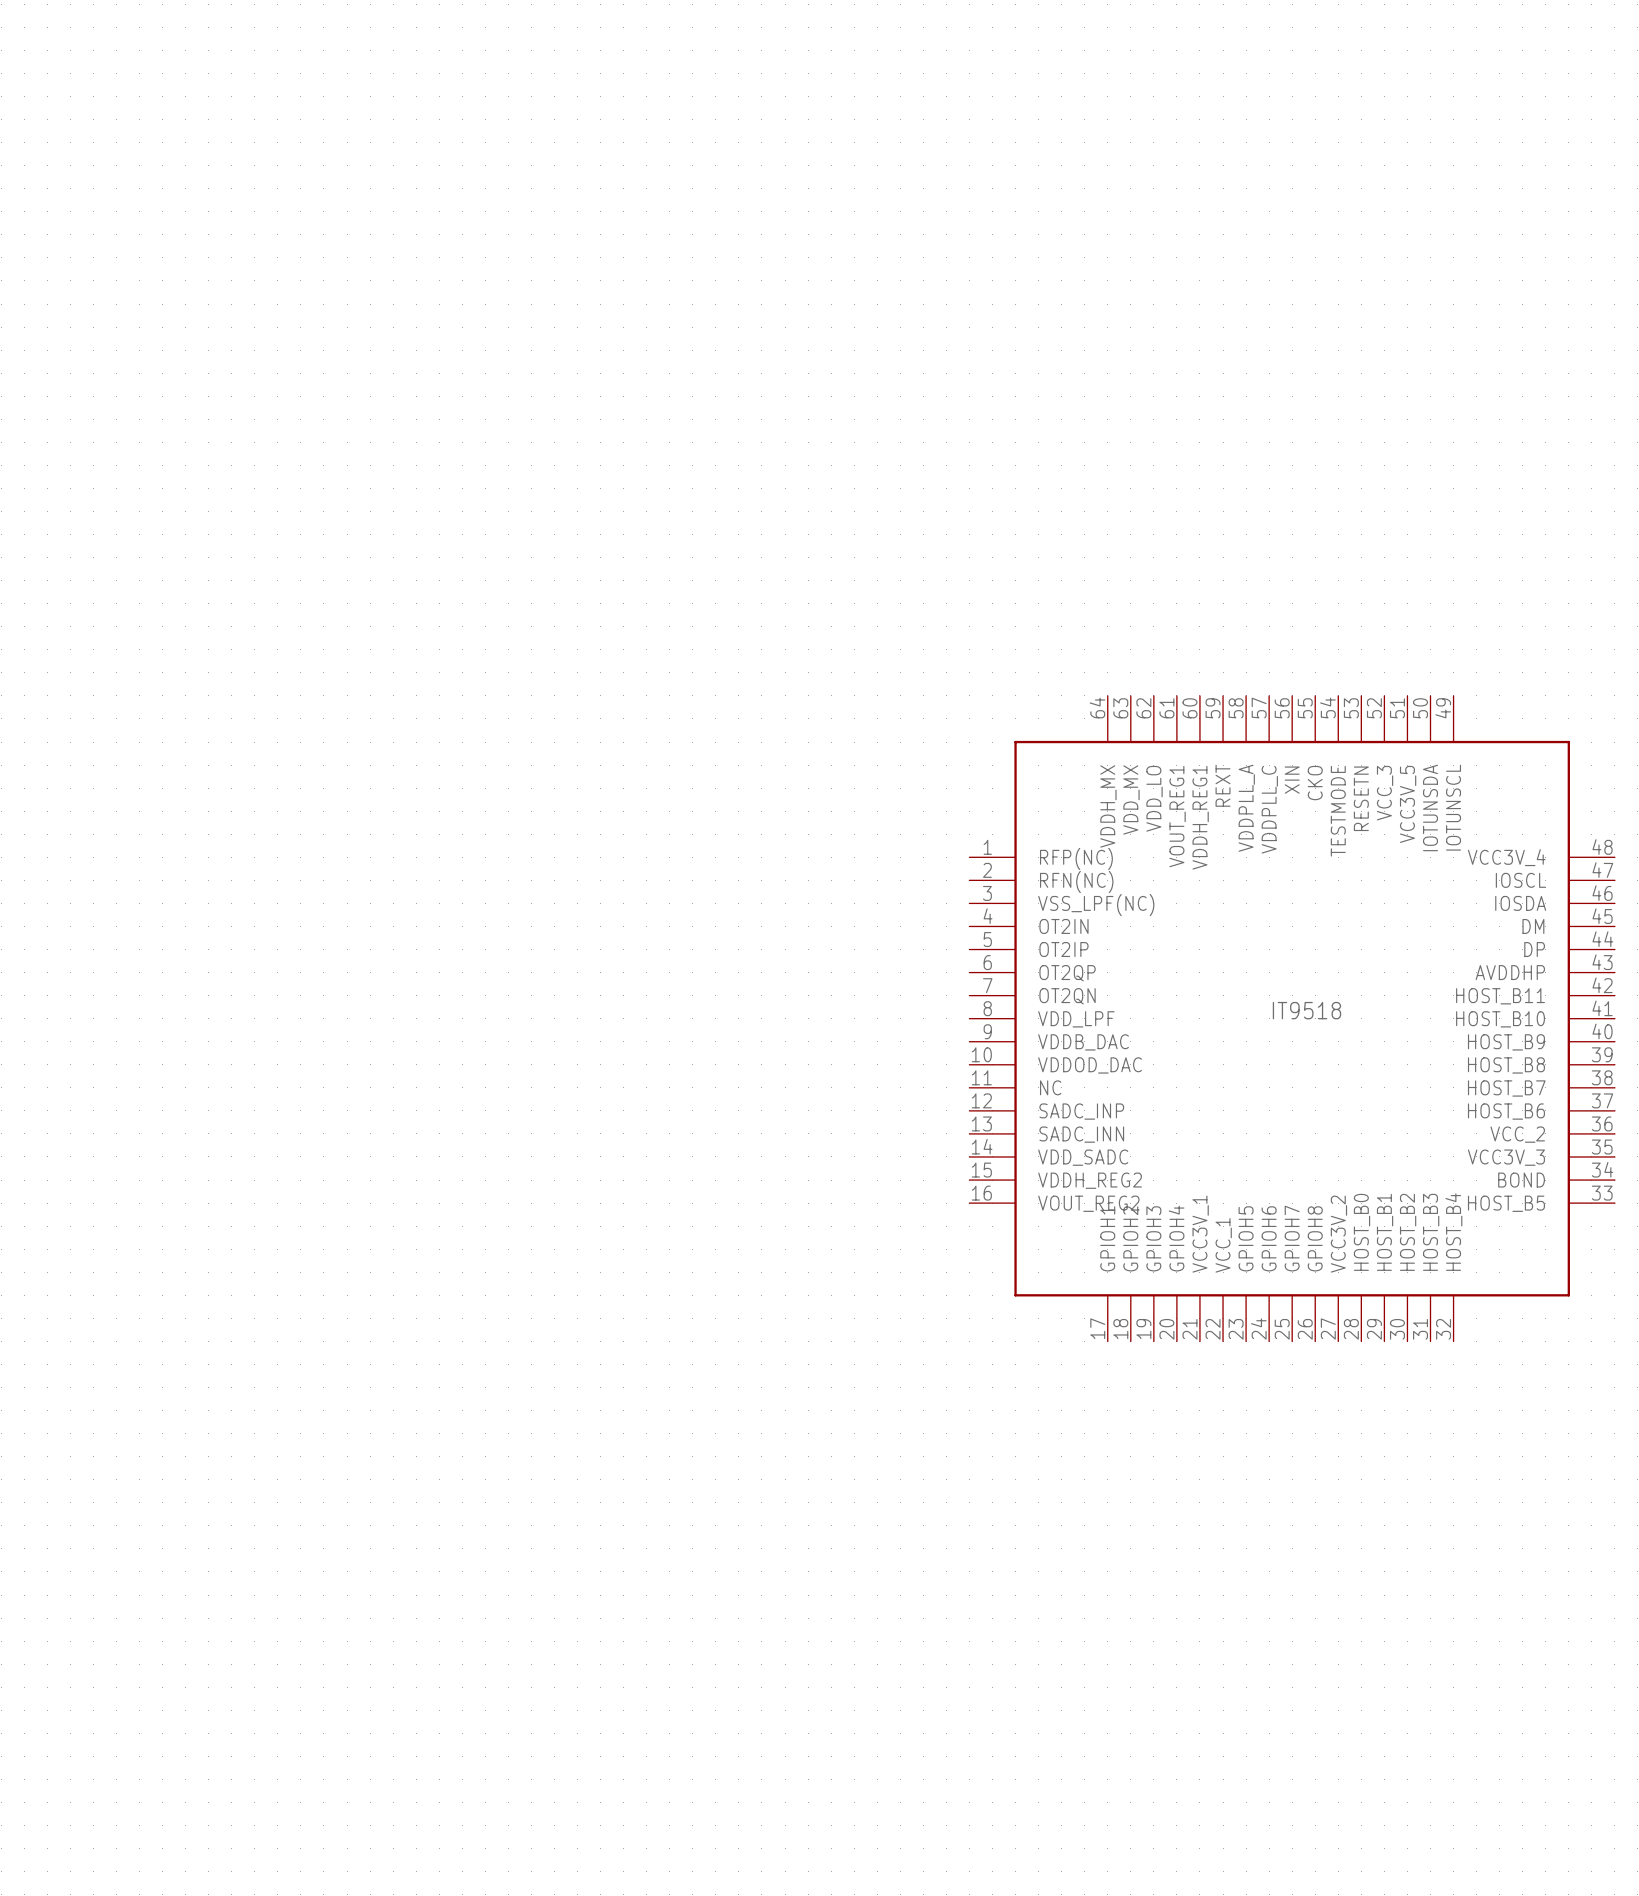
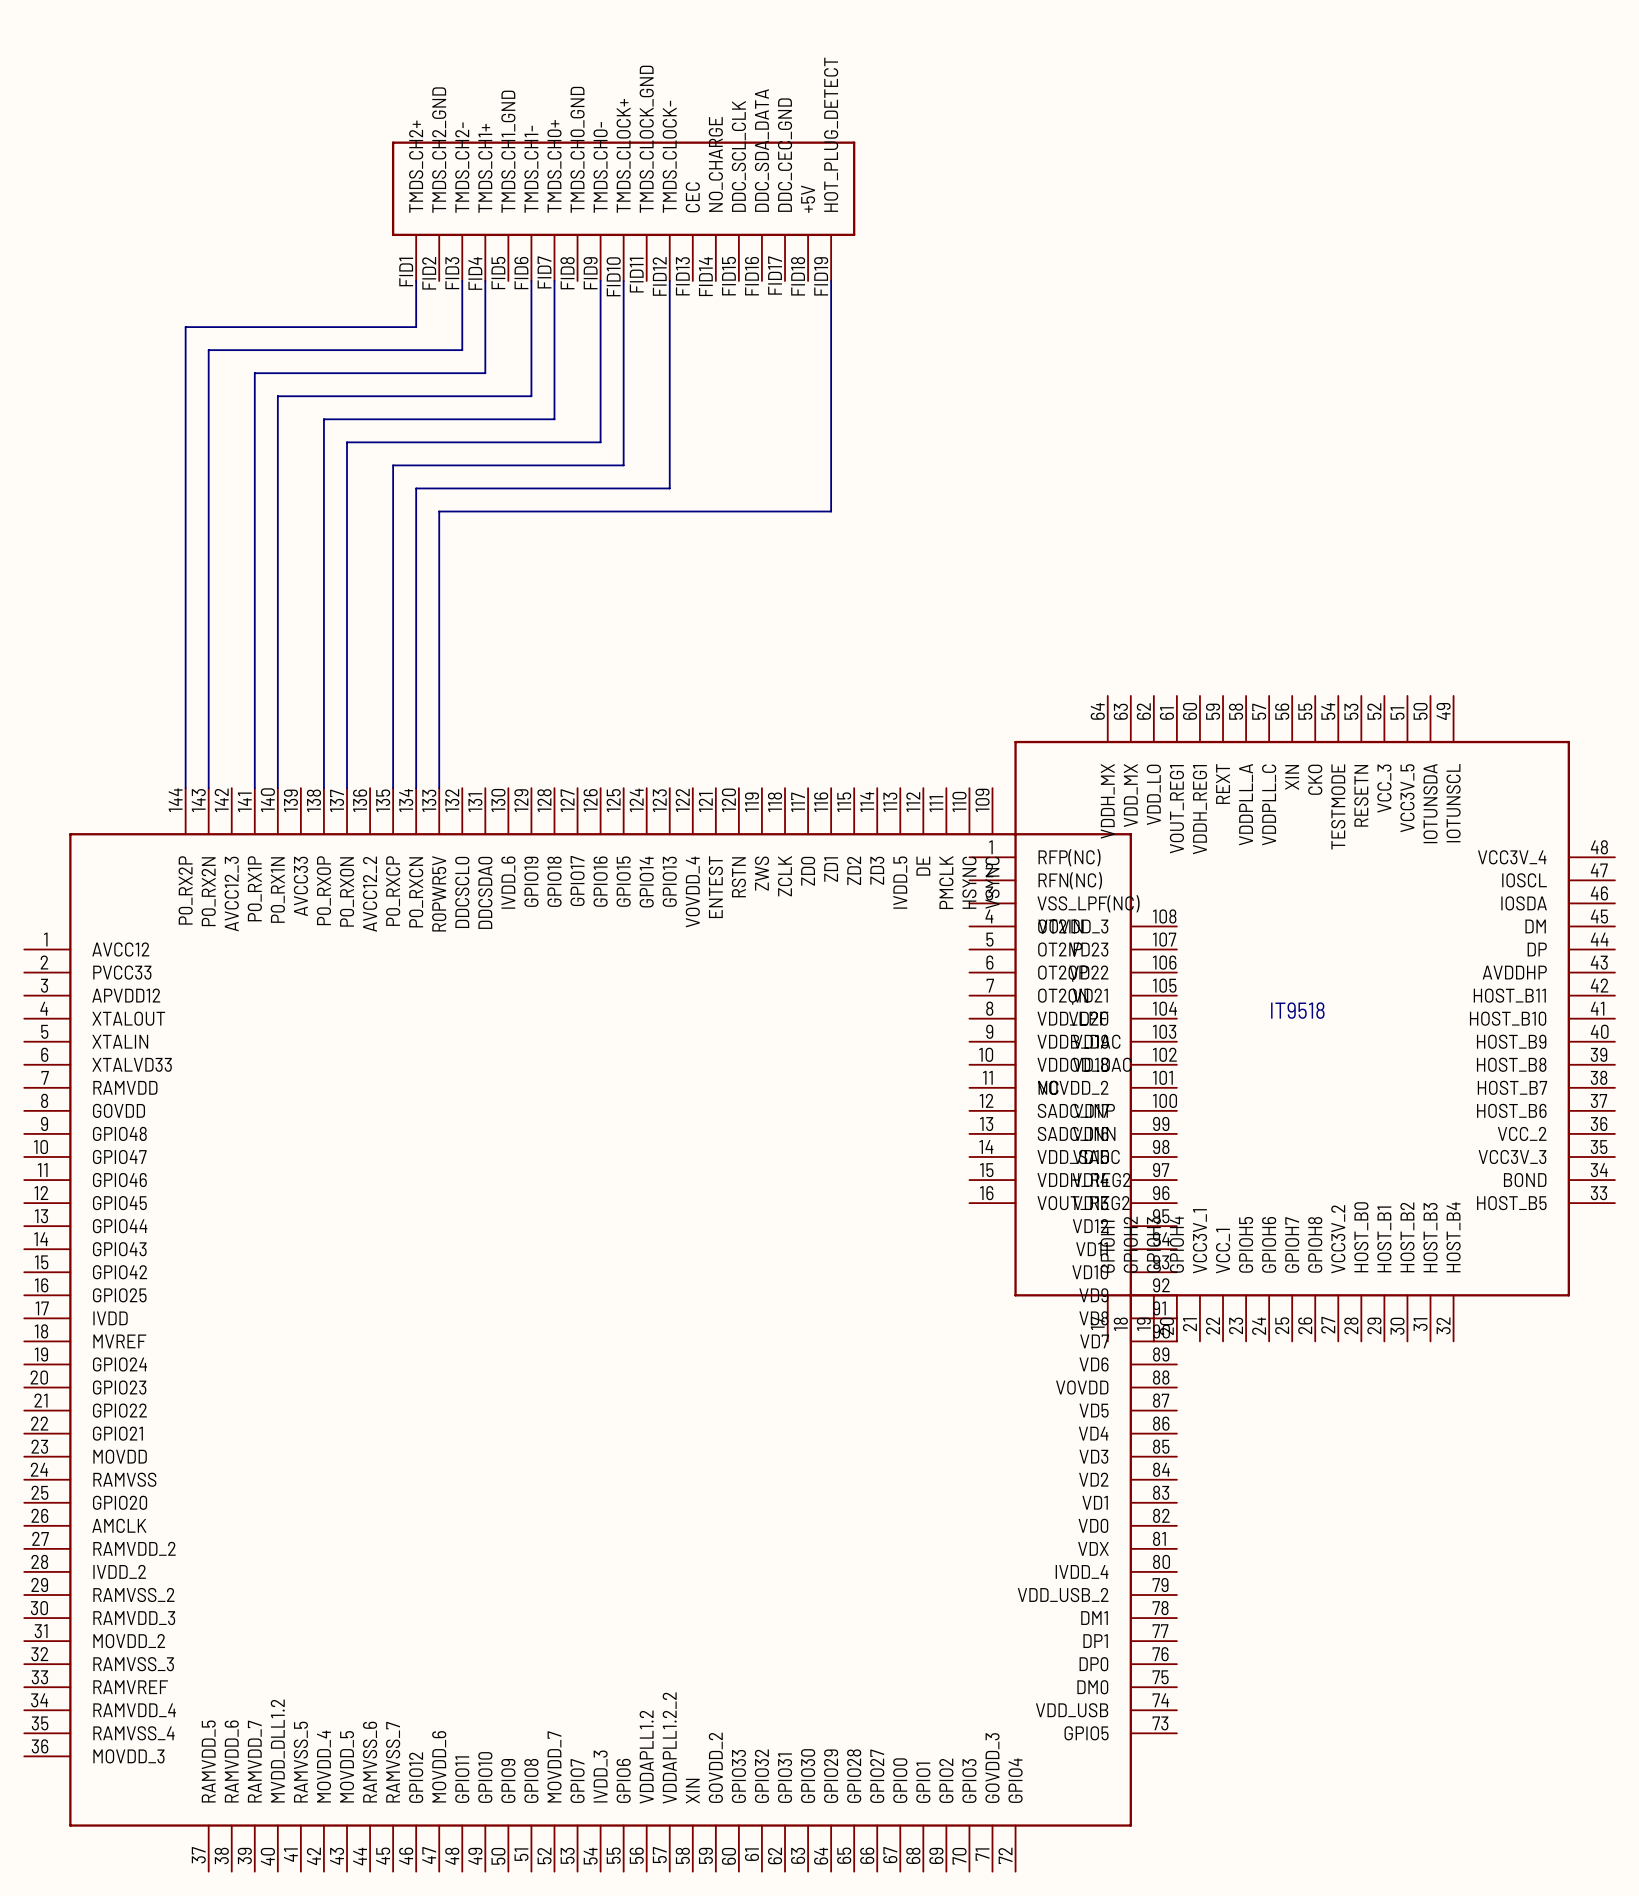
part: none -> (623, 211)
wire: none -> (416, 280) (416, 327) (185, 327) (185, 788)
wire: none -> (462, 280) (462, 350) (208, 350) (208, 788)
wire: none -> (485, 280) (485, 373) (254, 373) (254, 788)
wire: none -> (531, 280) (531, 396) (277, 396) (277, 788)
wire: none -> (554, 280) (554, 419) (323, 419) (323, 788)
wire: none -> (600, 280) (600, 442) (347, 442) (347, 788)
wire: none -> (623, 280) (623, 465) (393, 465) (393, 788)
wire: none -> (669, 280) (669, 488) (416, 488) (416, 788)
wire: none -> (831, 280) (831, 511) (439, 511) (439, 788)
part: none -> (600, 1329)

